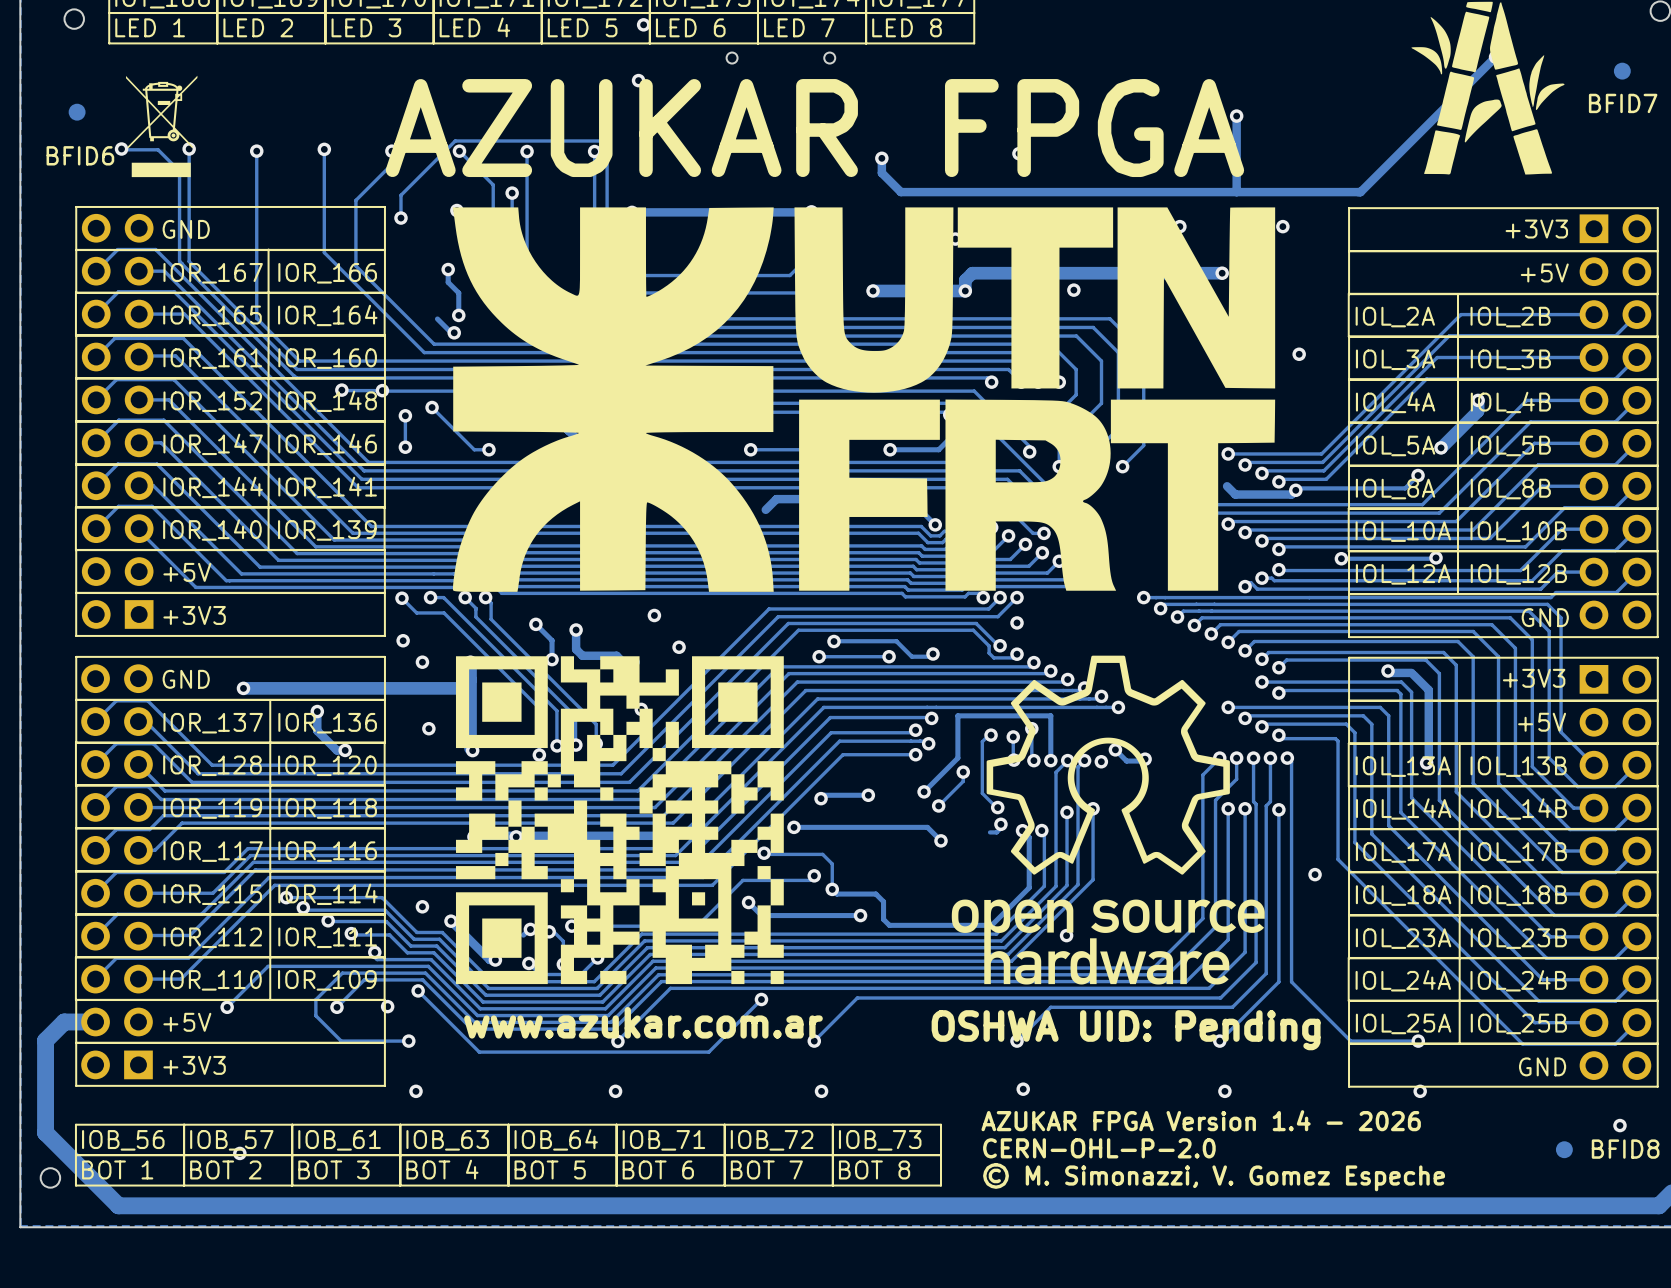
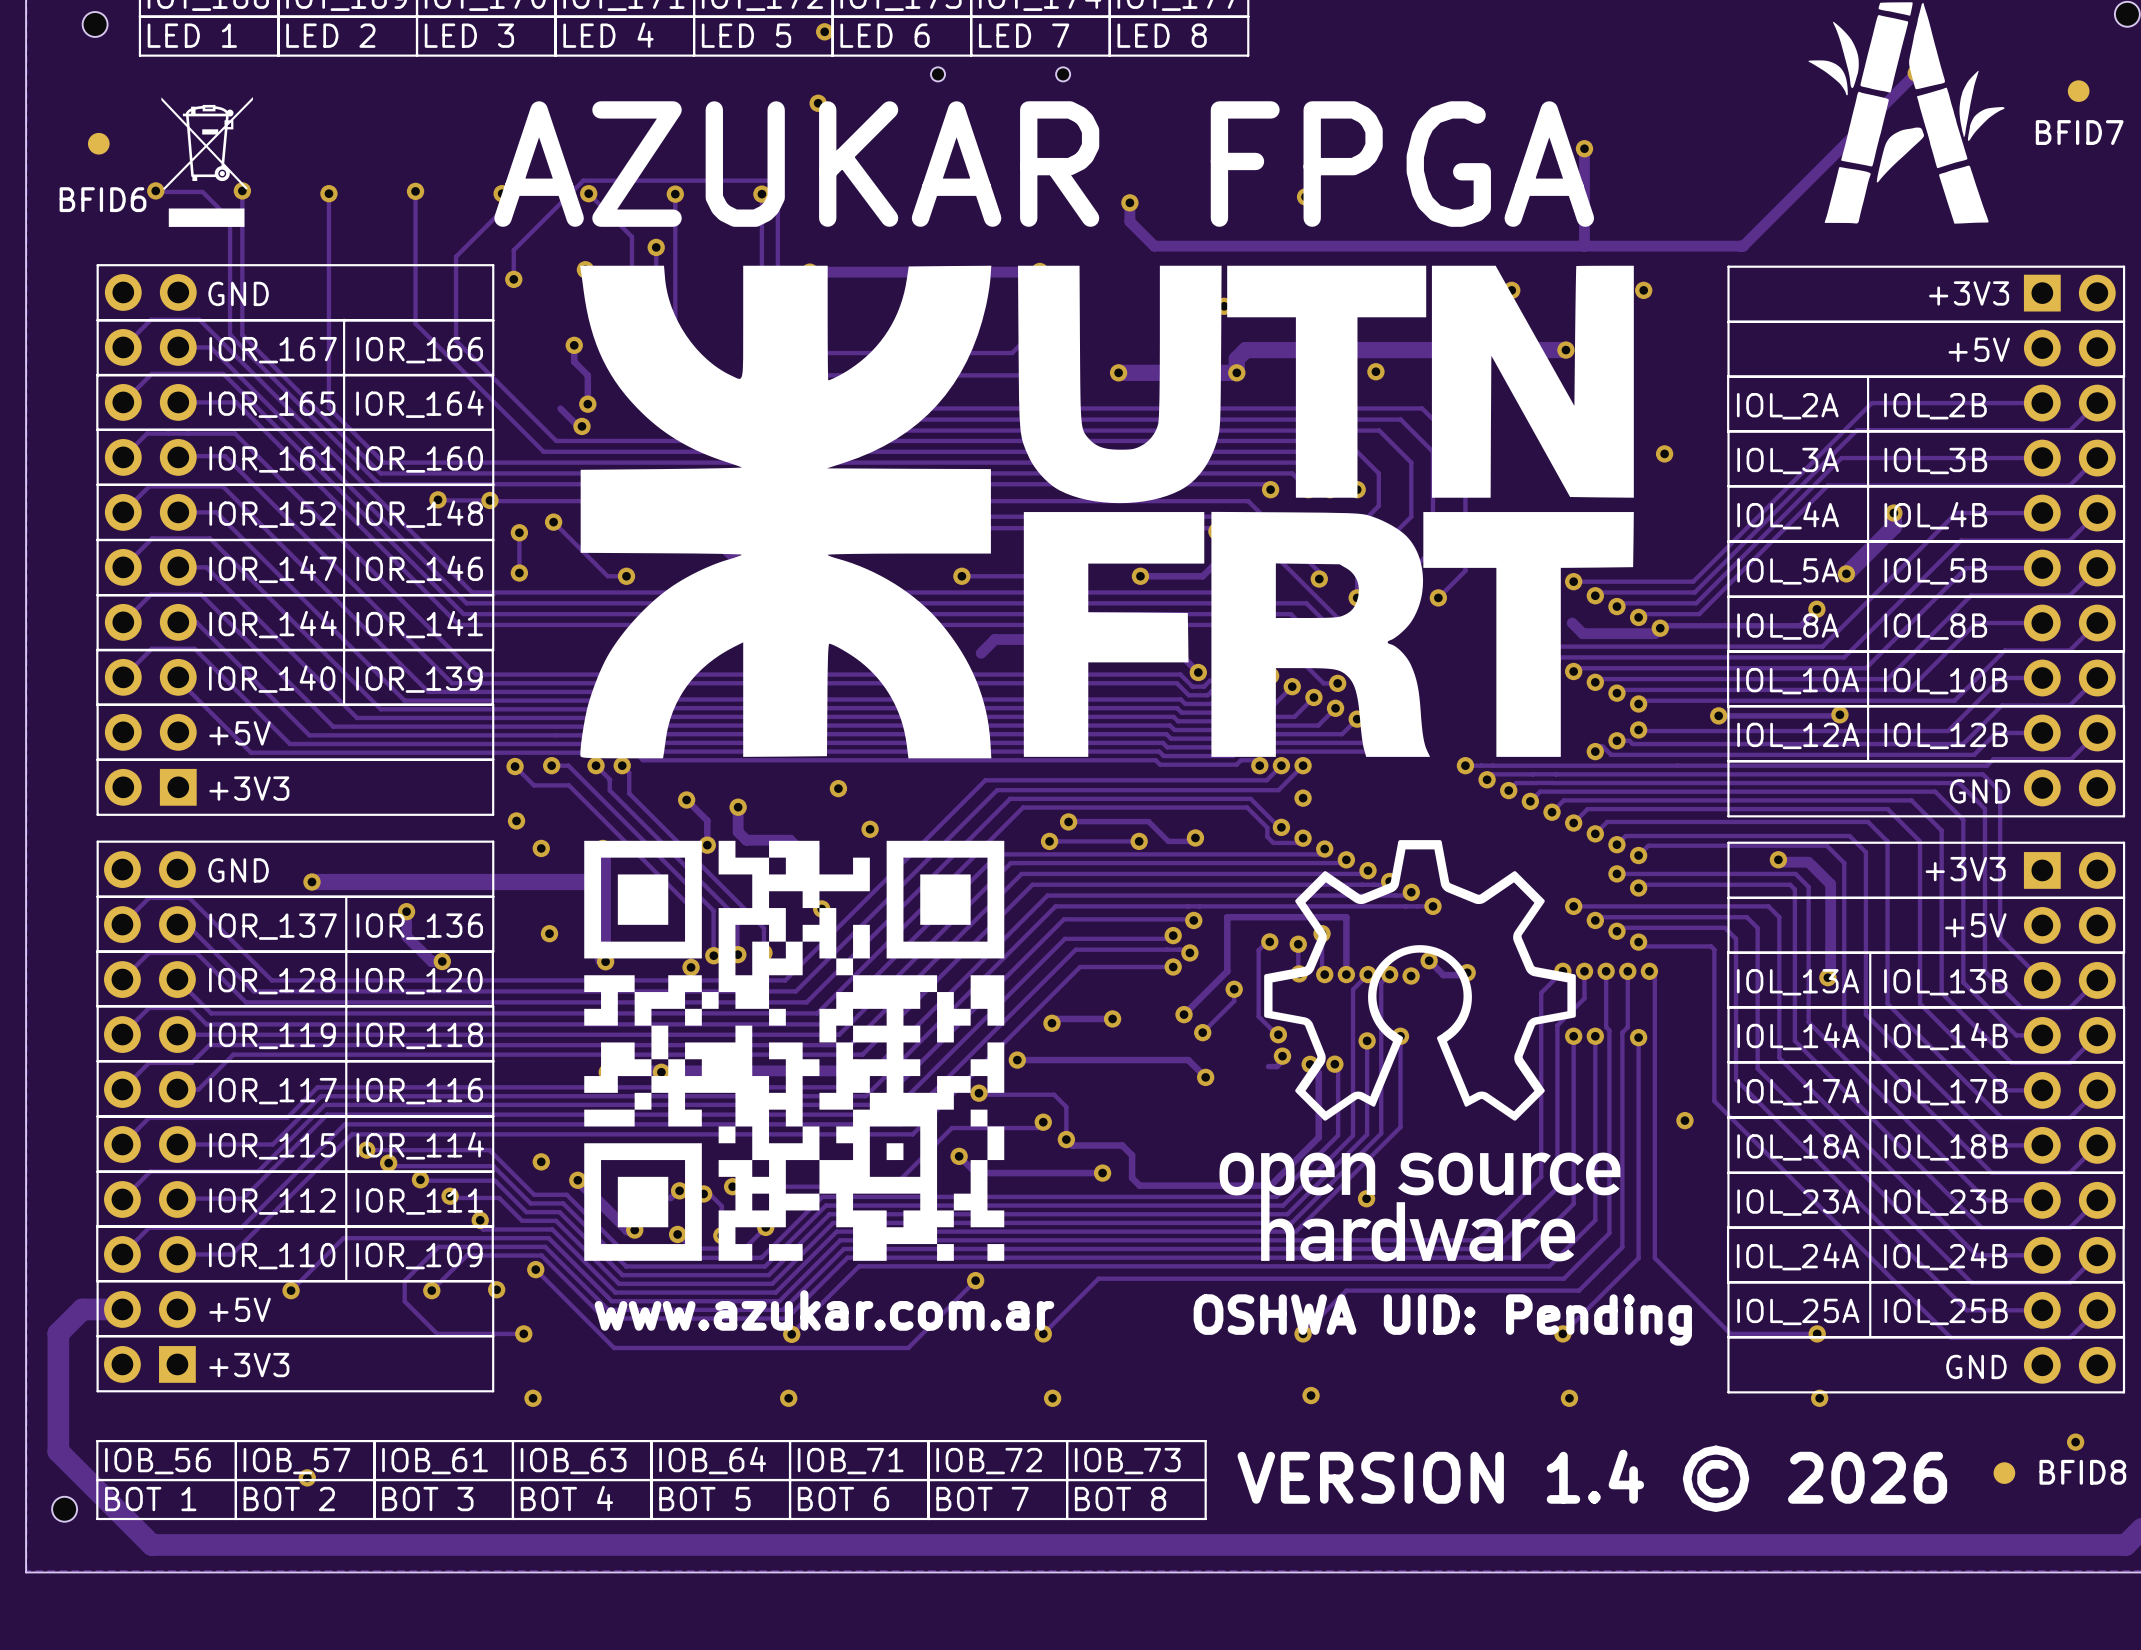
text: AZUKAR FPGA Version 1.4 - 2026 (1201, 1120) -> none
text: CERN-OHL-P-2.0 (1099, 1148) -> none
text: none -> VERSION 1.4 © 2026 (1592, 1478)
text: © M. Simonazzi, V. Gomez Espeche (1214, 1177) -> none

